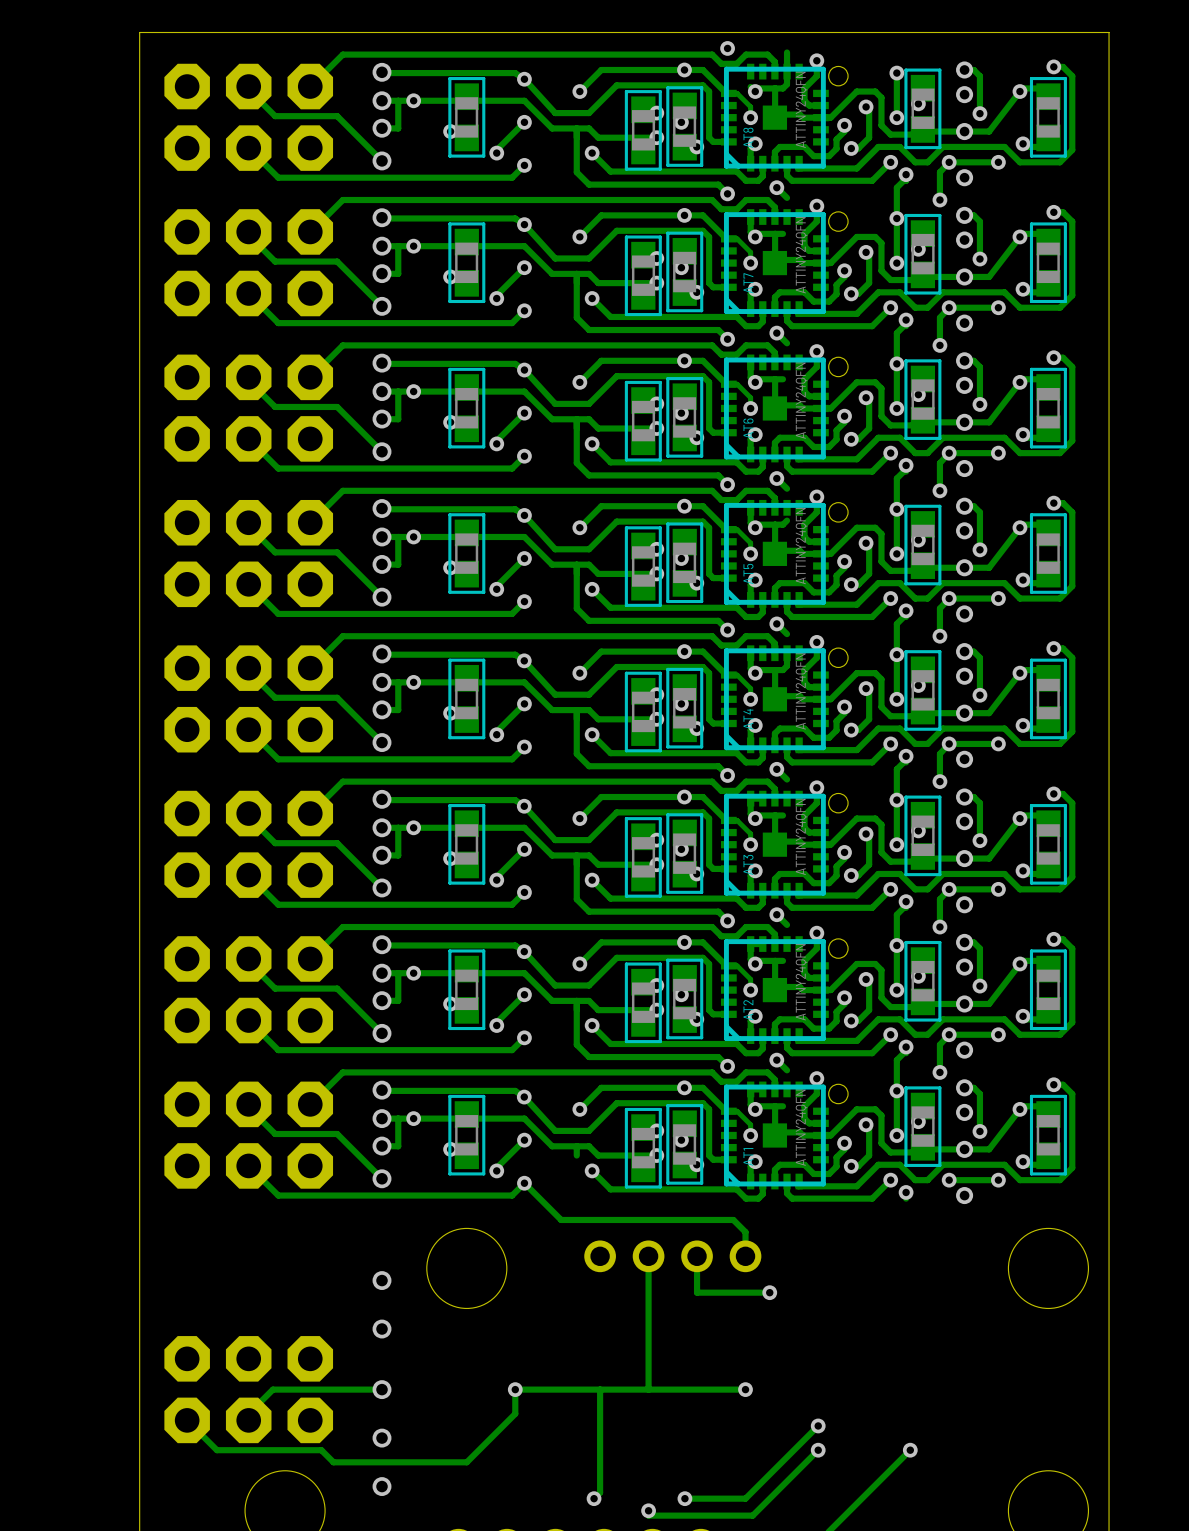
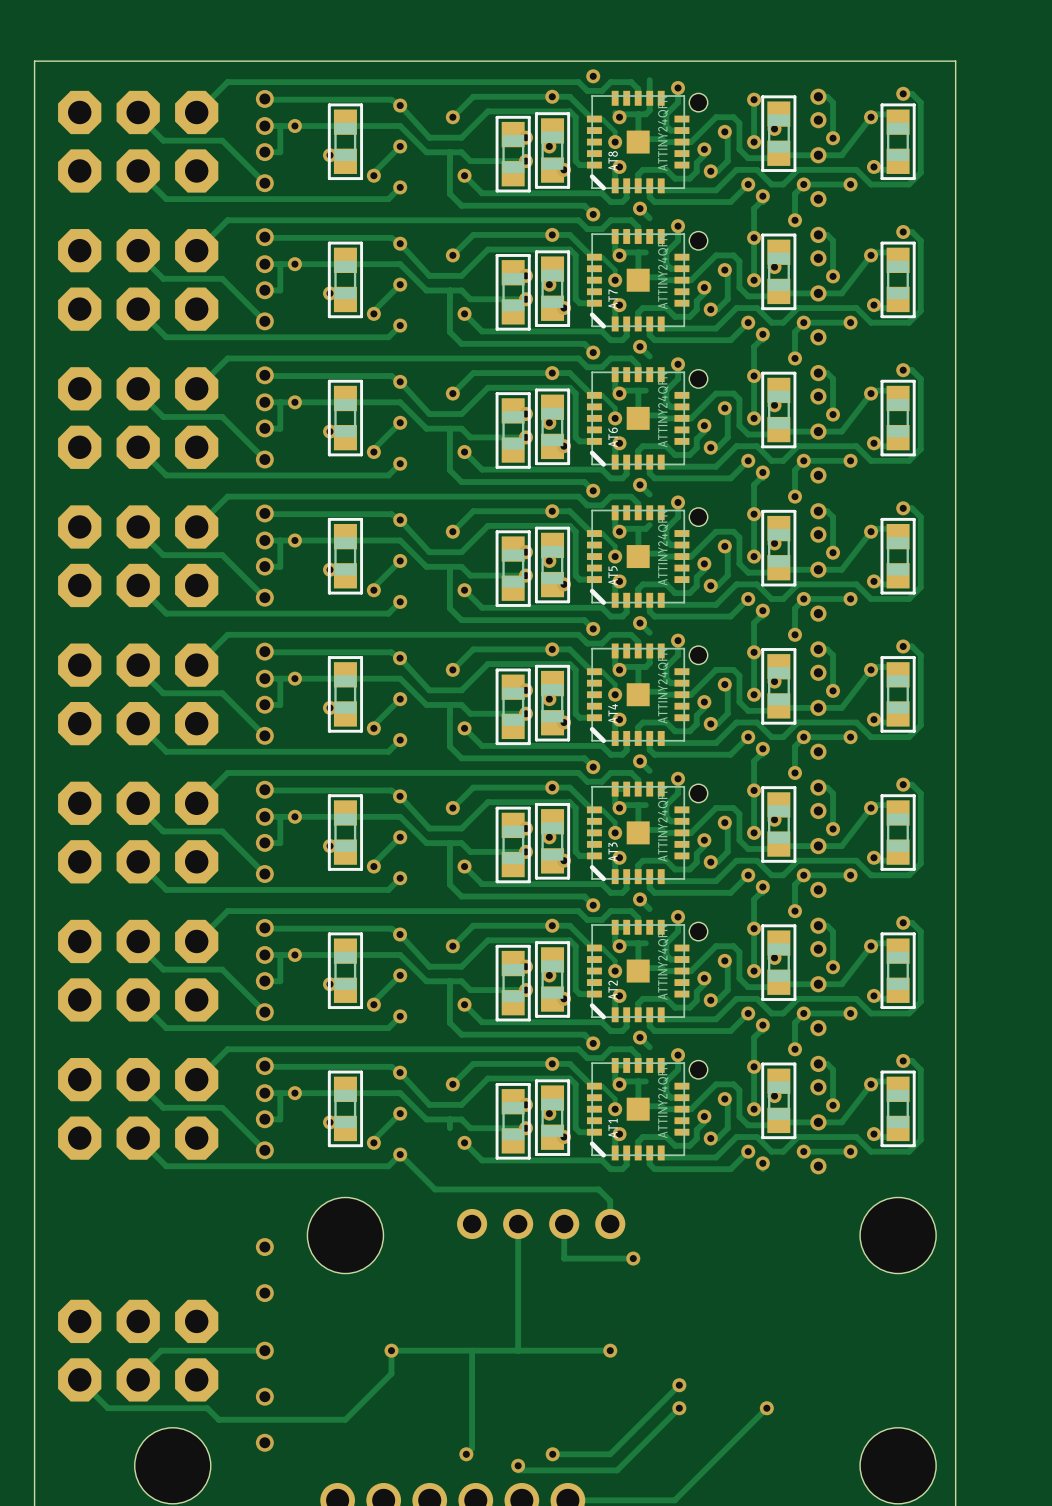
AT8 footprint: [720, 63, 829, 172] -> [586, 90, 690, 194]
AT7 footprint: [720, 209, 829, 317] -> [586, 228, 690, 332]
AT6 footprint: [720, 354, 829, 463] -> [586, 367, 690, 470]
AT5 footprint: [720, 499, 829, 608] -> [586, 505, 690, 608]
AT4 footprint: [720, 645, 829, 754] -> [586, 643, 690, 746]
AT3 footprint: [720, 790, 829, 899] -> [586, 781, 690, 885]
AT2 footprint: [720, 936, 829, 1045] -> [586, 919, 690, 1023]
AT1 footprint: [720, 1081, 829, 1190] -> [586, 1057, 690, 1161]

